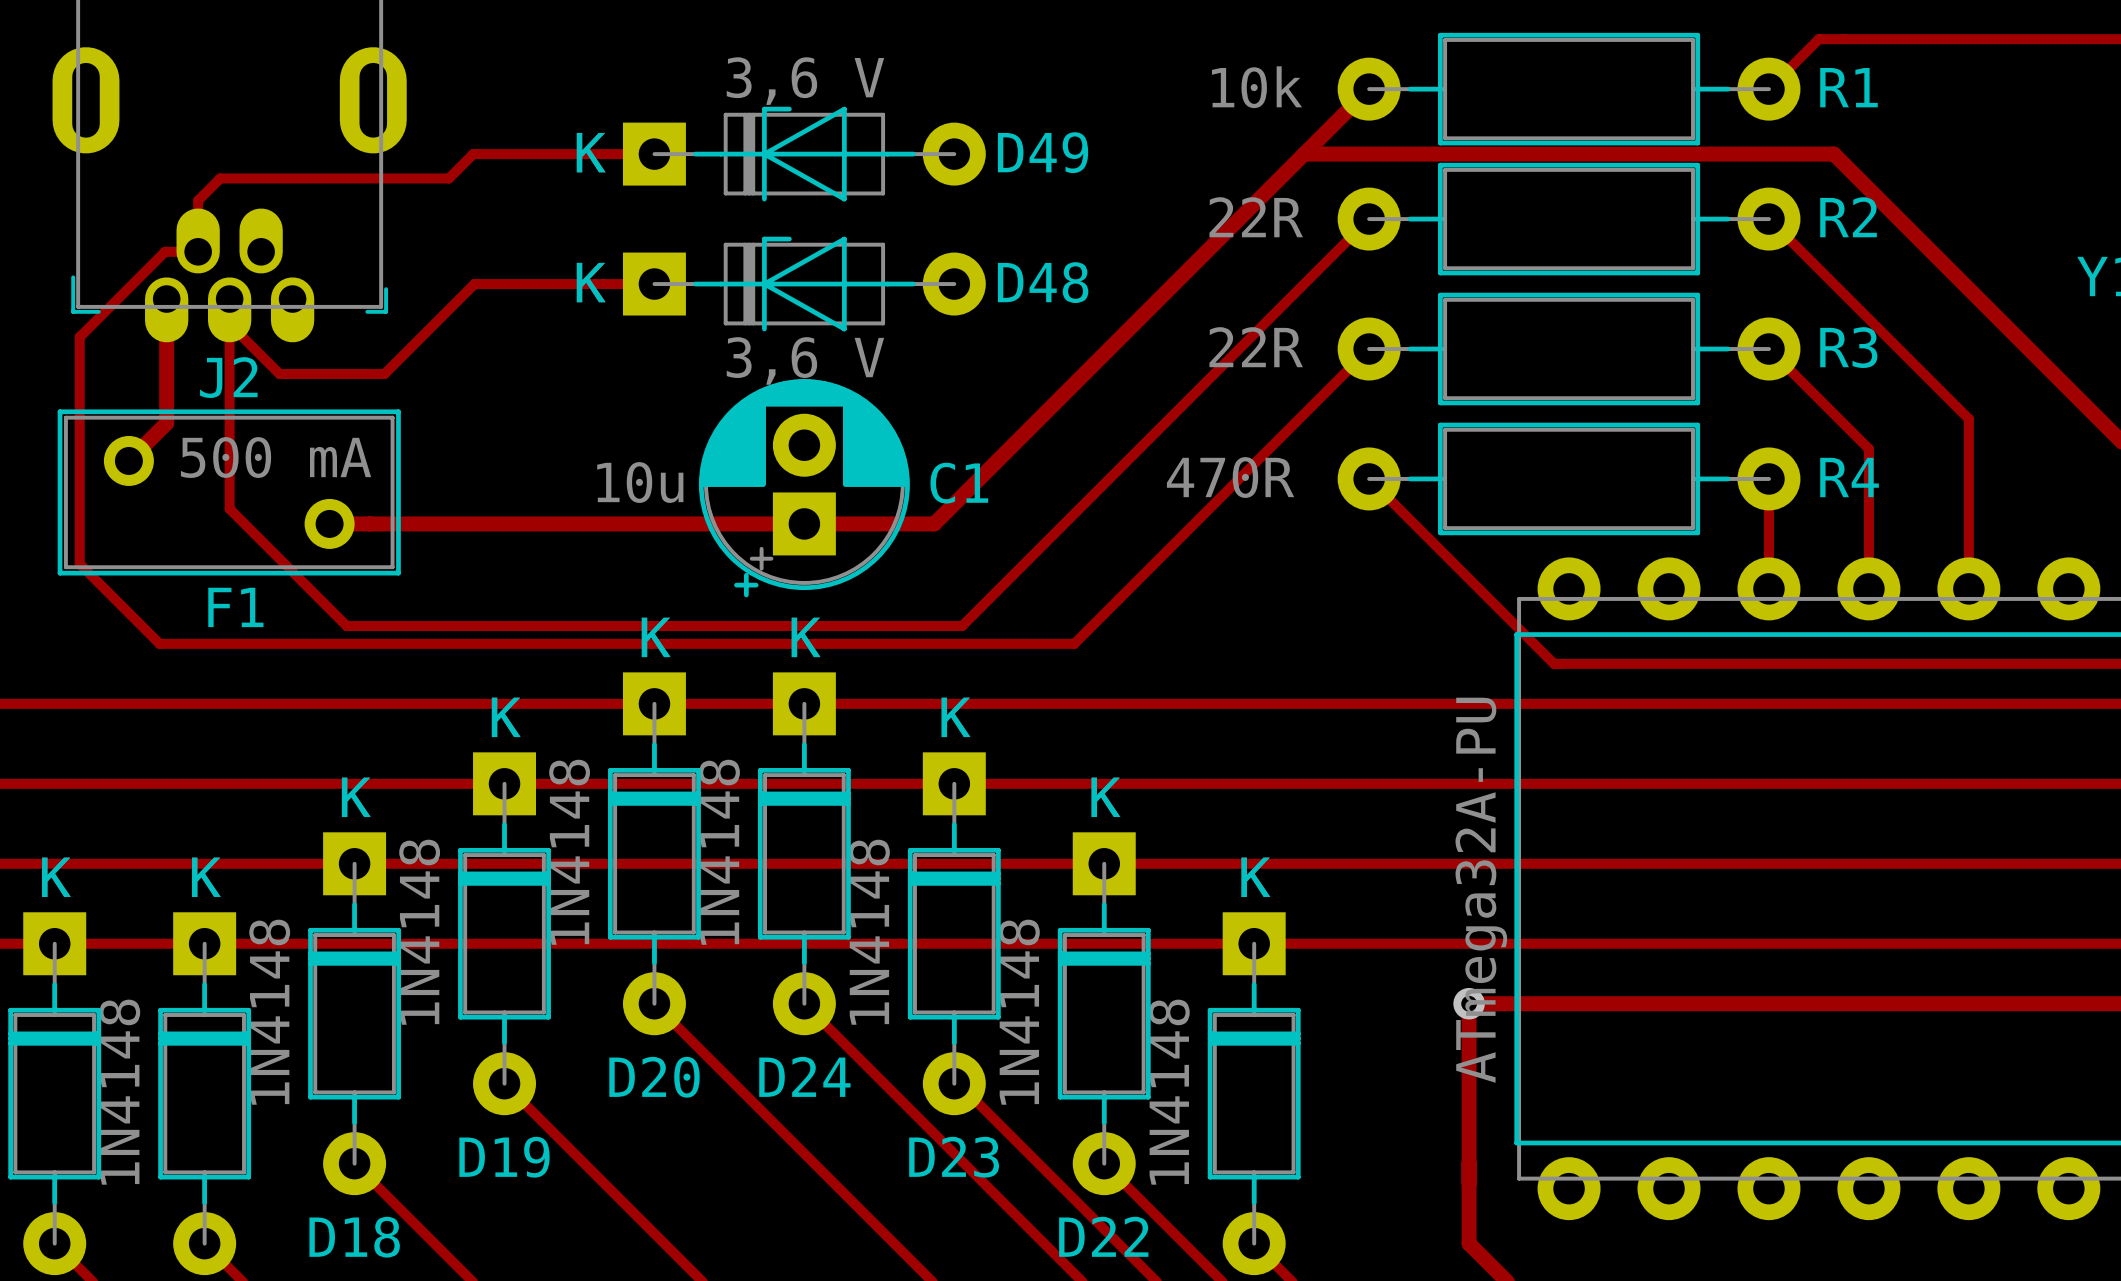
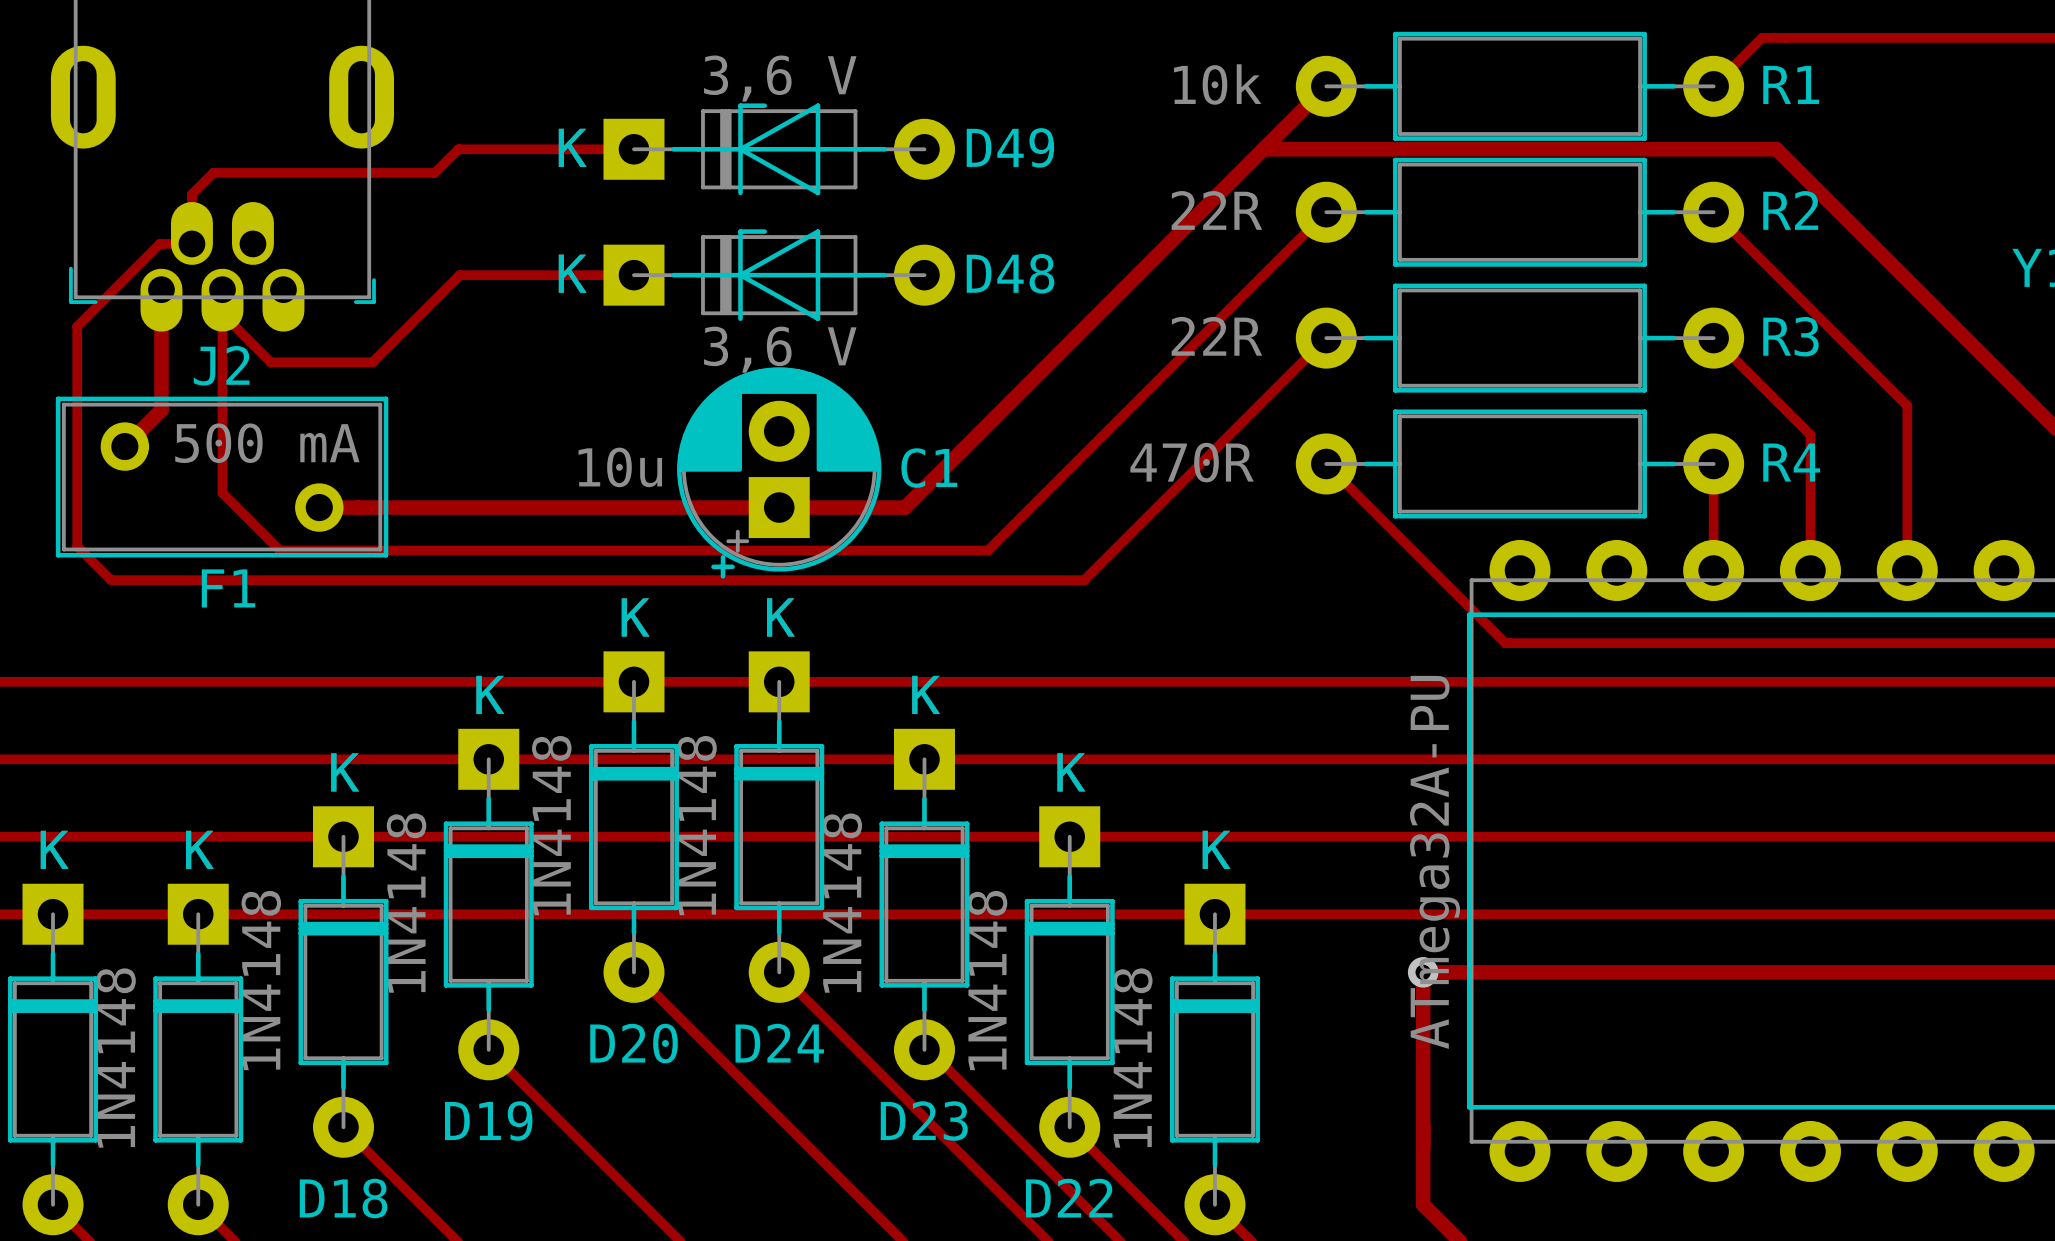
track: (288, 568) (346, 626) (962, 626) (1019, 568) -> (279, 550) (988, 550)
track: (114, 598) (159, 643) (1074, 643) (1119, 598) -> (111, 580) (1084, 580)

